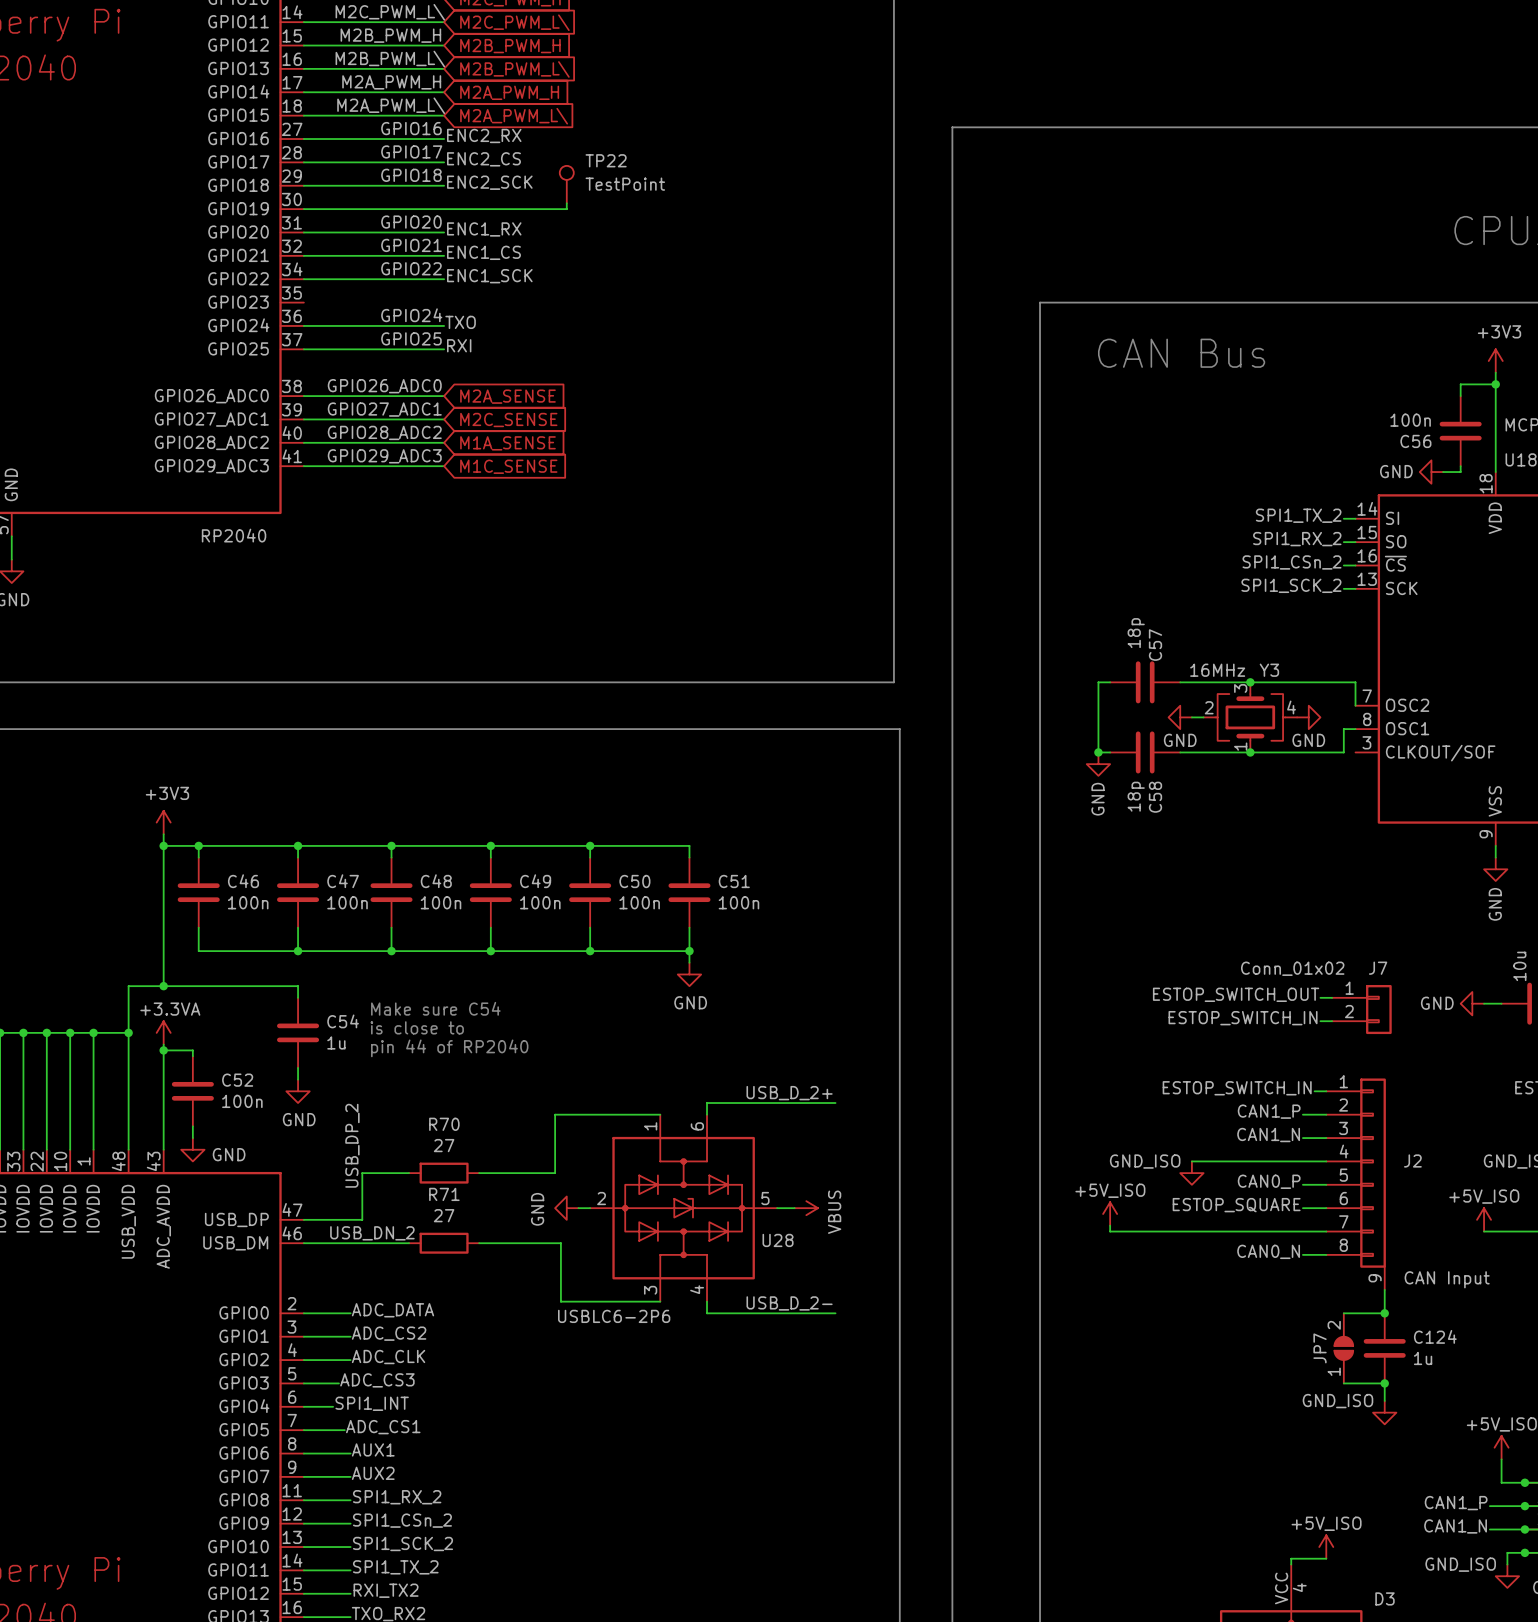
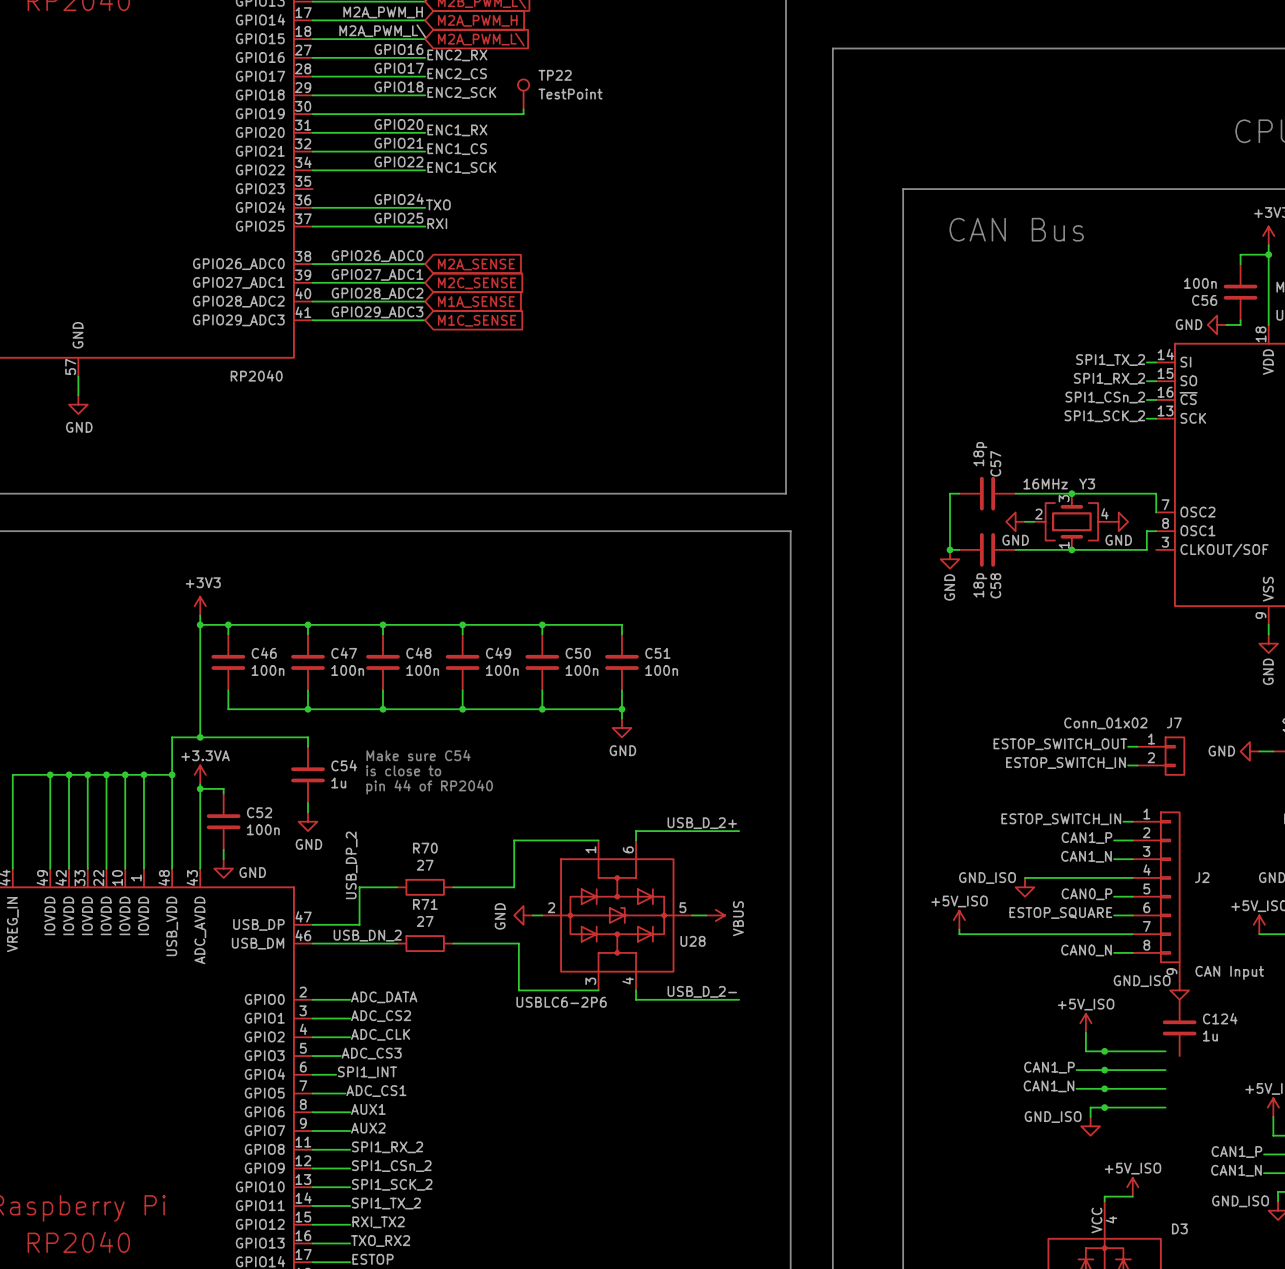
wire: (1384, 1289) (1384, 1313) (1343, 1313) -> none
power symbol: none -> GND_ISO (1179, 990)
junction: (1384, 1313) -> none
power symbol: none -> +5V_ISO (1085, 1023)
JP7: (1343, 1348) -> none
wire: none -> (1085, 1032) (1085, 1051) (1165, 1051)
junction: none -> (1104, 1051)
wire: (1343, 1383) (1384, 1383) (1384, 1400) -> none
junction: (1384, 1383) -> none
label: none -> CAN1_P (1049, 1067)
wire: none -> (1076, 1070) (1165, 1070)
junction: none -> (1104, 1070)
power symbol: GND_ISO (1384, 1412) -> none
label: none -> CAN1_N (1049, 1086)
wire: none -> (1076, 1088) (1165, 1088)
junction: none -> (1104, 1088)
junction: none -> (1104, 1107)
wire: none -> (1165, 1107) (1090, 1107) (1090, 1116)
power symbol: none -> GND_ISO (1090, 1126)

